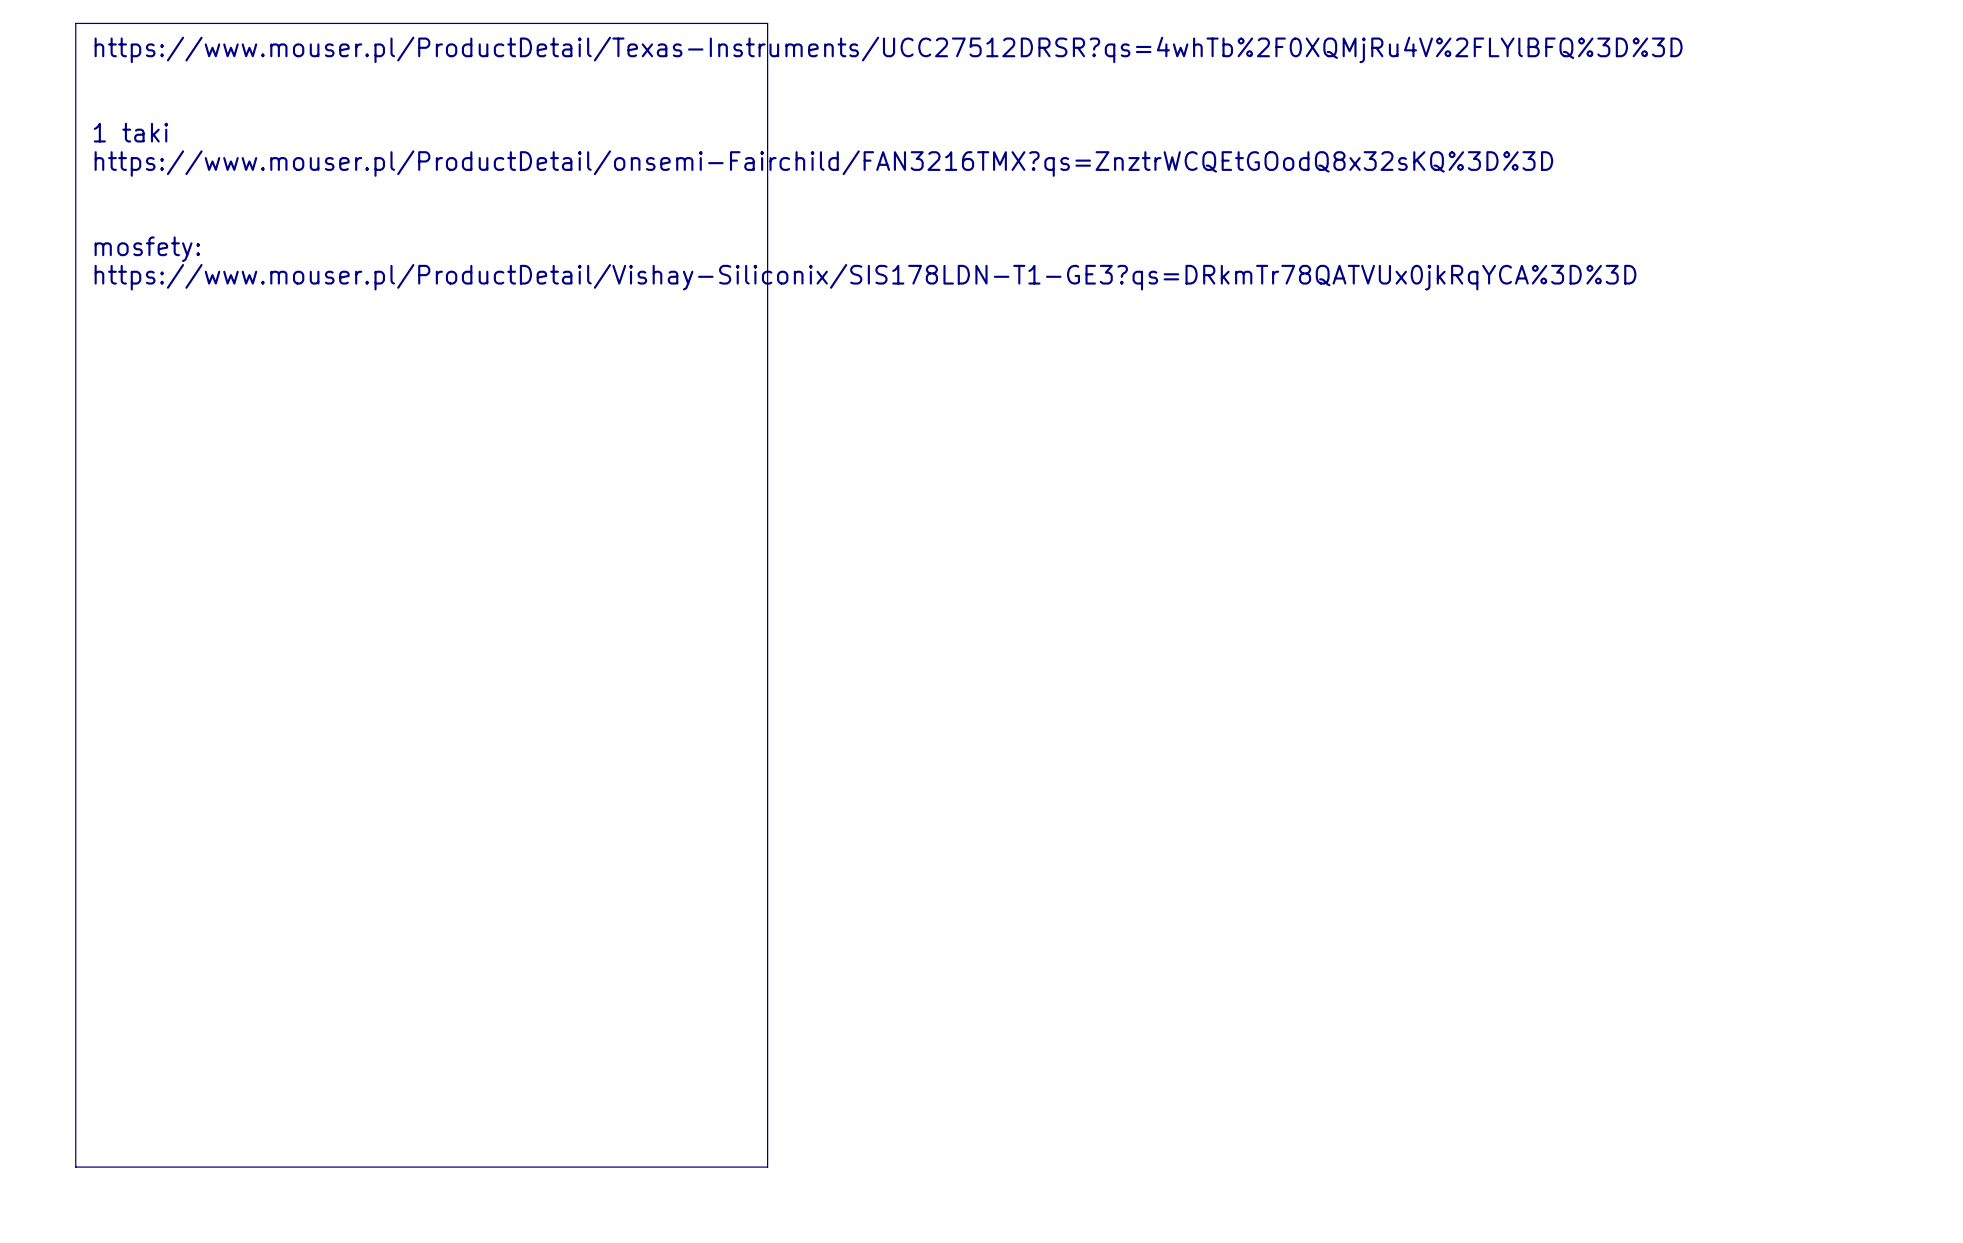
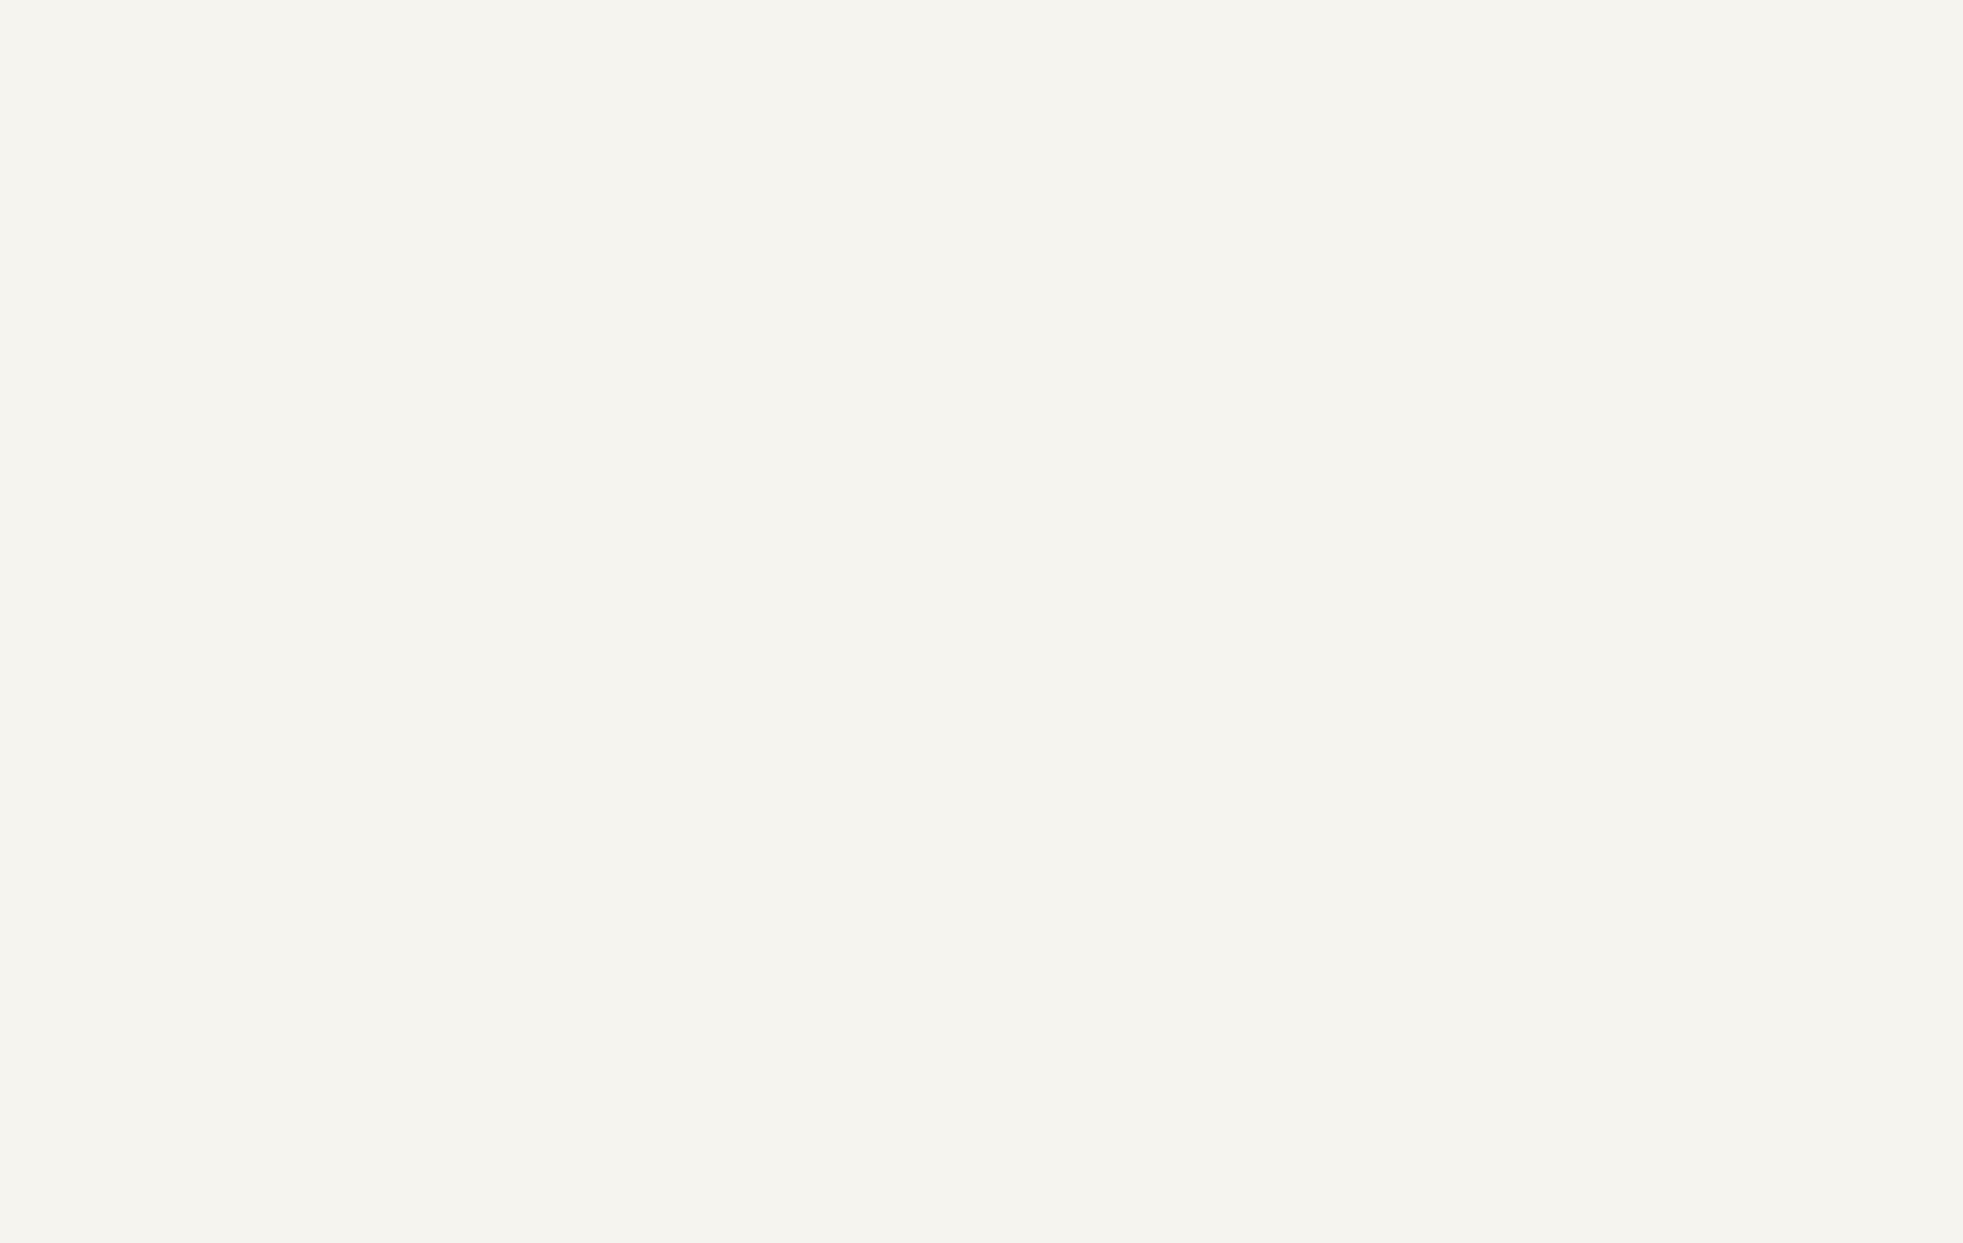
line: (75, 23) (767, 23) (767, 1167) (75, 1167) (75, 23) -> none
text: https://www.mouser.pl/ProductDetail/Texas-Instruments/UCC27512DRSR?qs=4whTb%2F0XQMjRu4V%2FLYlBFQ%3D%3D (888, 49) -> none
text: 1 taki (130, 132) -> none
text: https://www.mouser.pl/ProductDetail/onsemi-Fairchild/FAN3216TMX?qs=ZnztrWCQEtGOodQ8x32sKQ%3D%3D (823, 163) -> none
text: mosfety: (147, 249) -> none
text: https://www.mouser.pl/ProductDetail/Vishay-Siliconix/SIS178LDN-T1-GE3?qs=DRkmTr78QATVUx0jkRqYCA%3D%3D (865, 277) -> none

